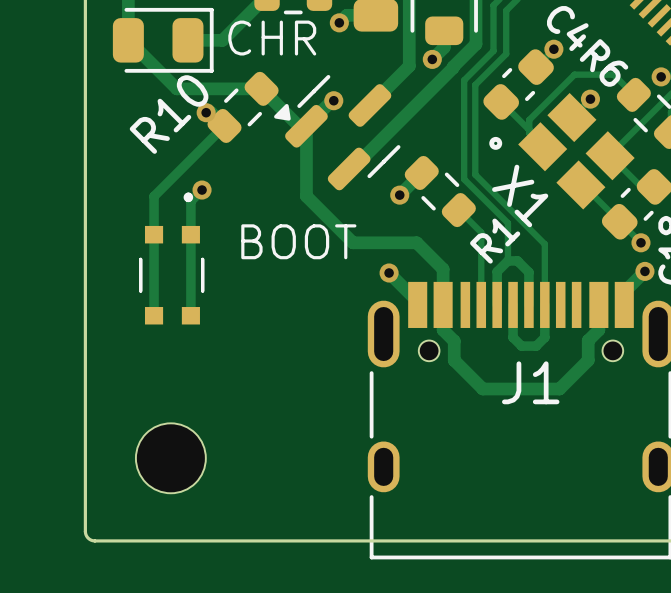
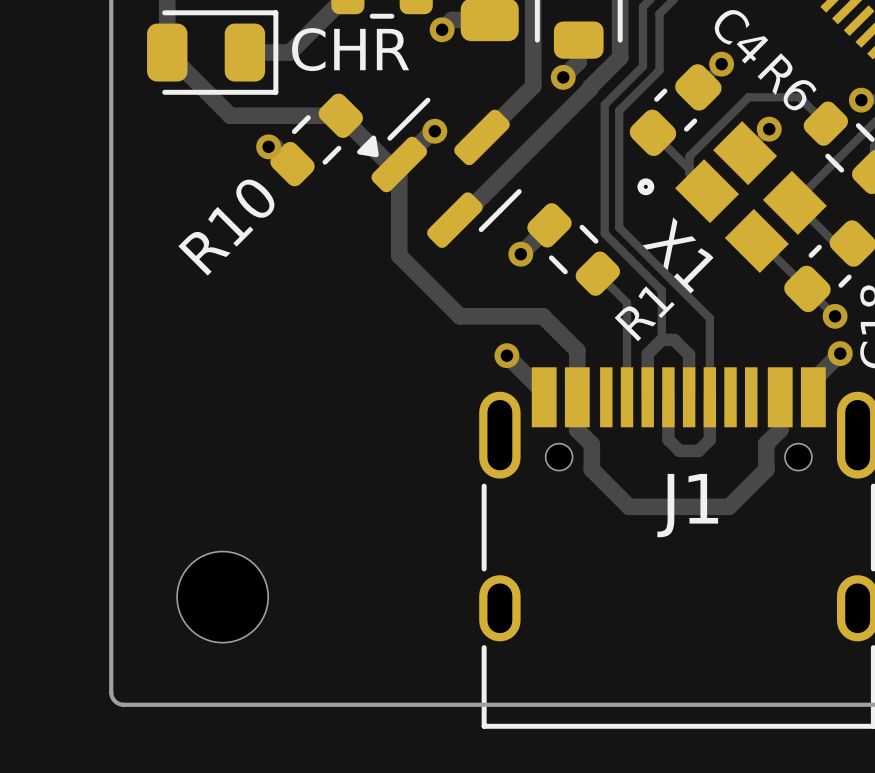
R10 name position: R10 (169, 114) -> R10 (226, 227)
track: (224, 125) (154, 196) (154, 315) -> none
track: (202, 190) (190, 201) (190, 315) -> none
via: (202, 190) -> none
text: BOOT (298, 241) -> none
part: (171, 258) -> none

